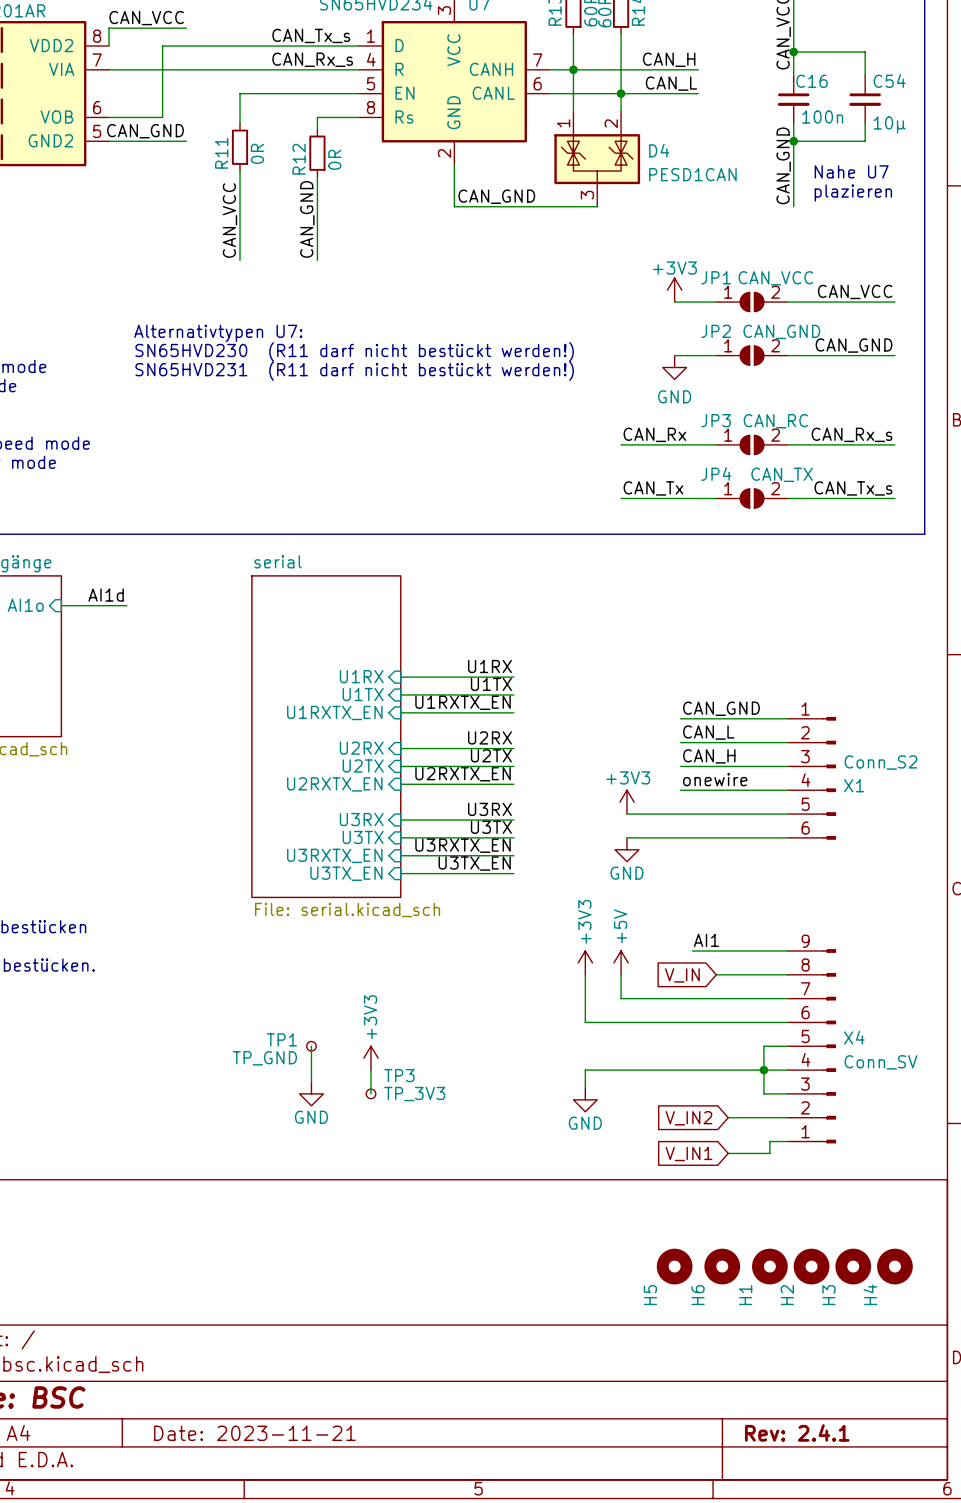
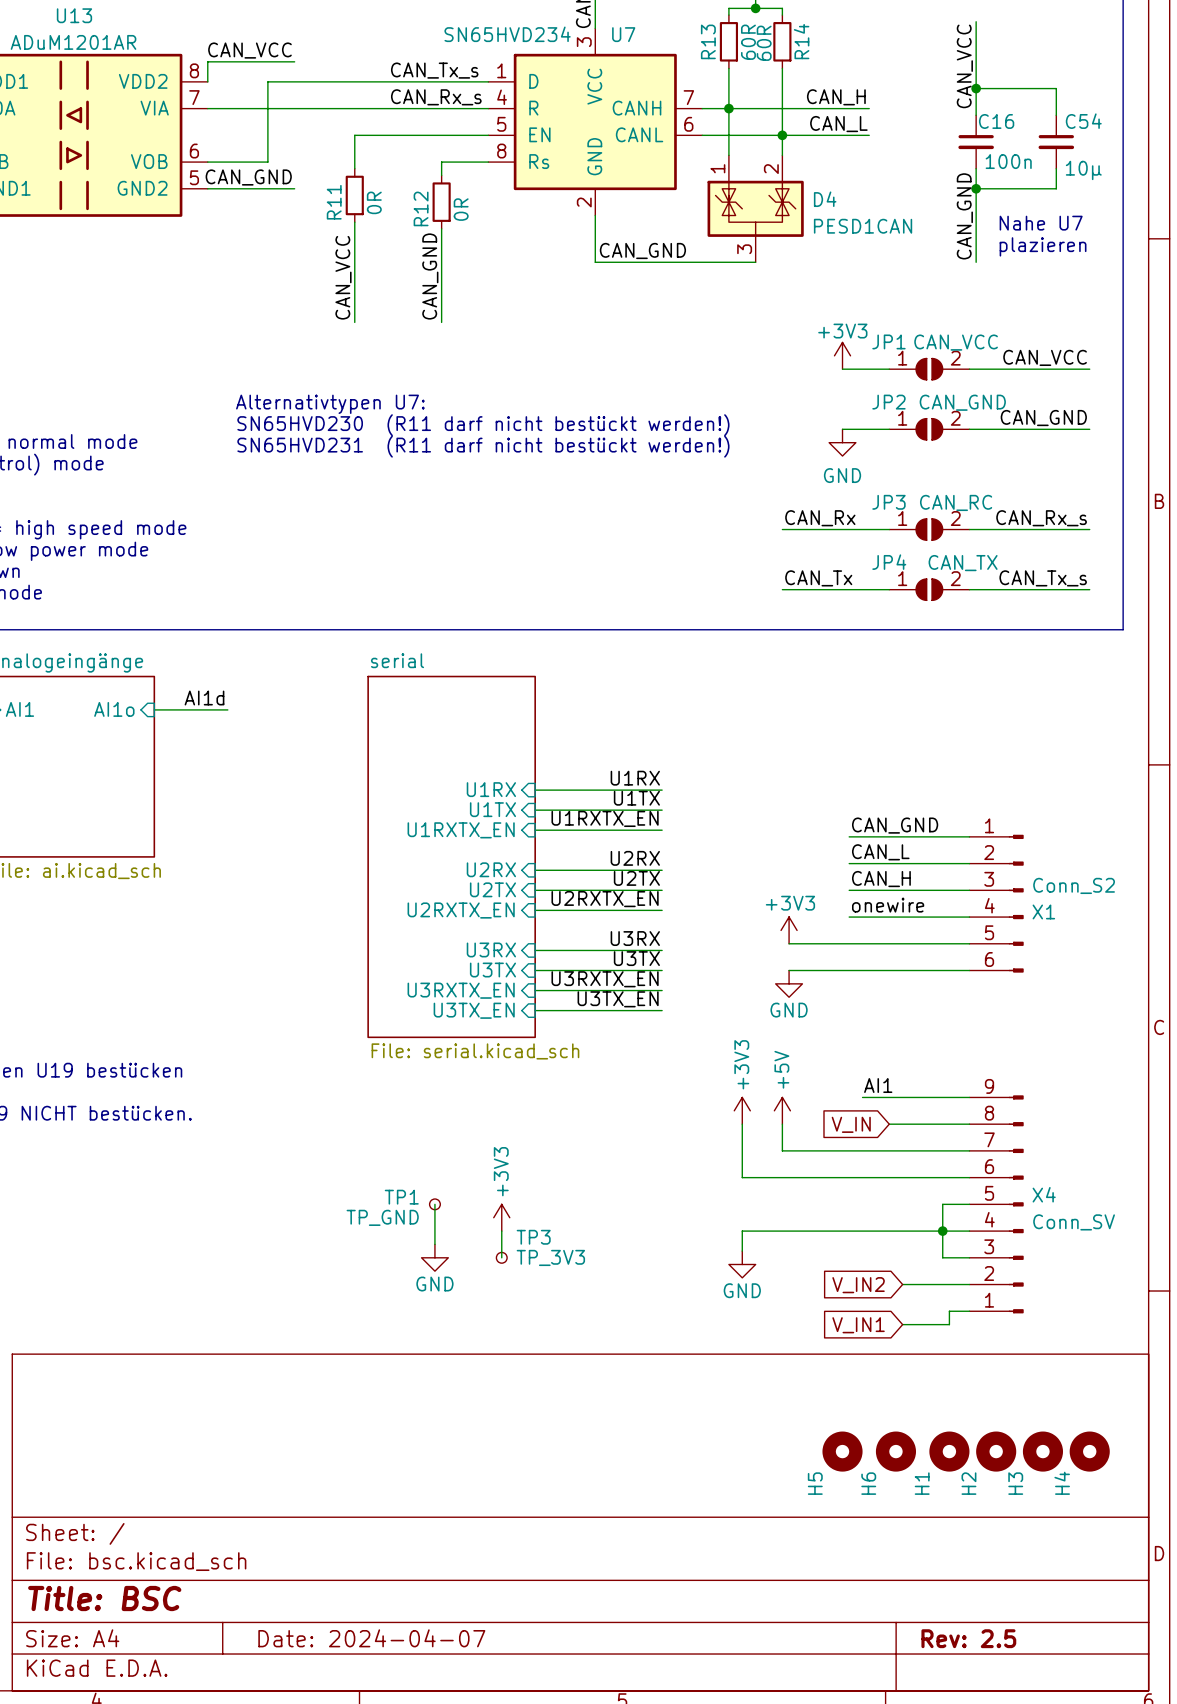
title block: Rev: 2.4.1 (797, 1432) -> Rev: 2.5 (968, 1638)
title block: Date: 2023-11-21 (254, 1433) -> Date: 2024-04-07 (371, 1638)

